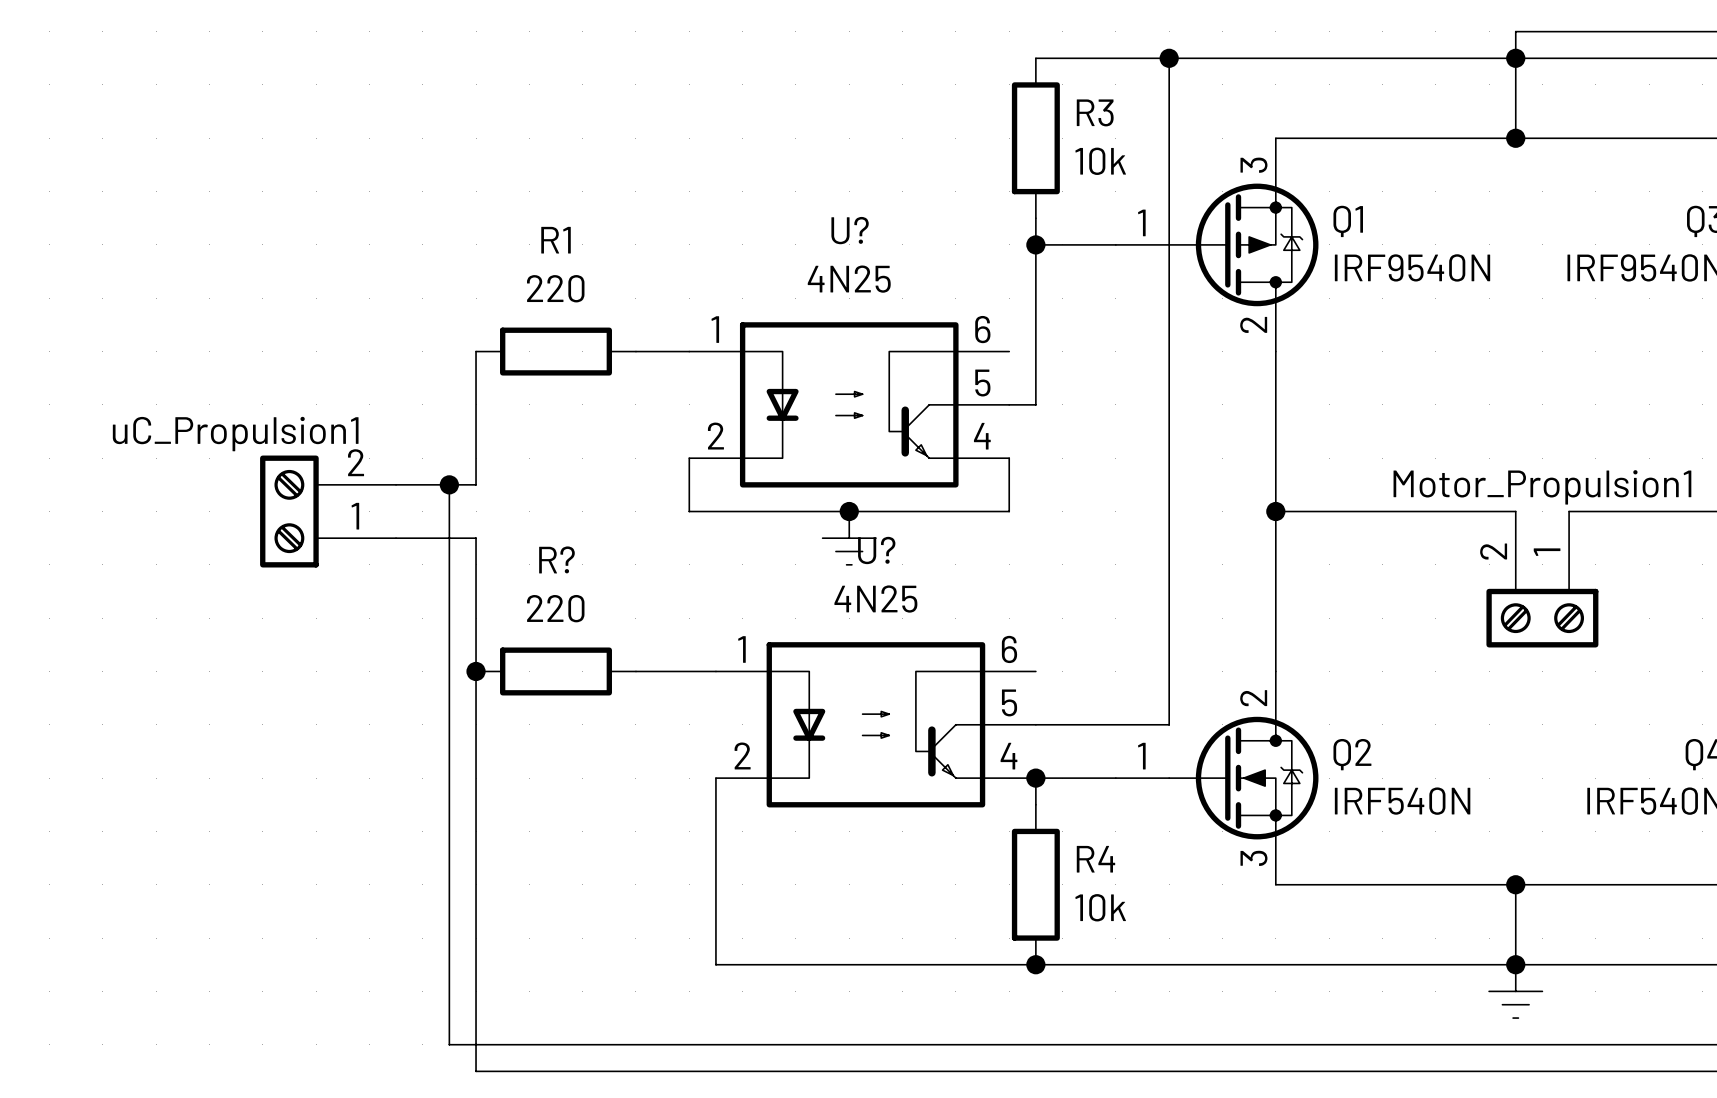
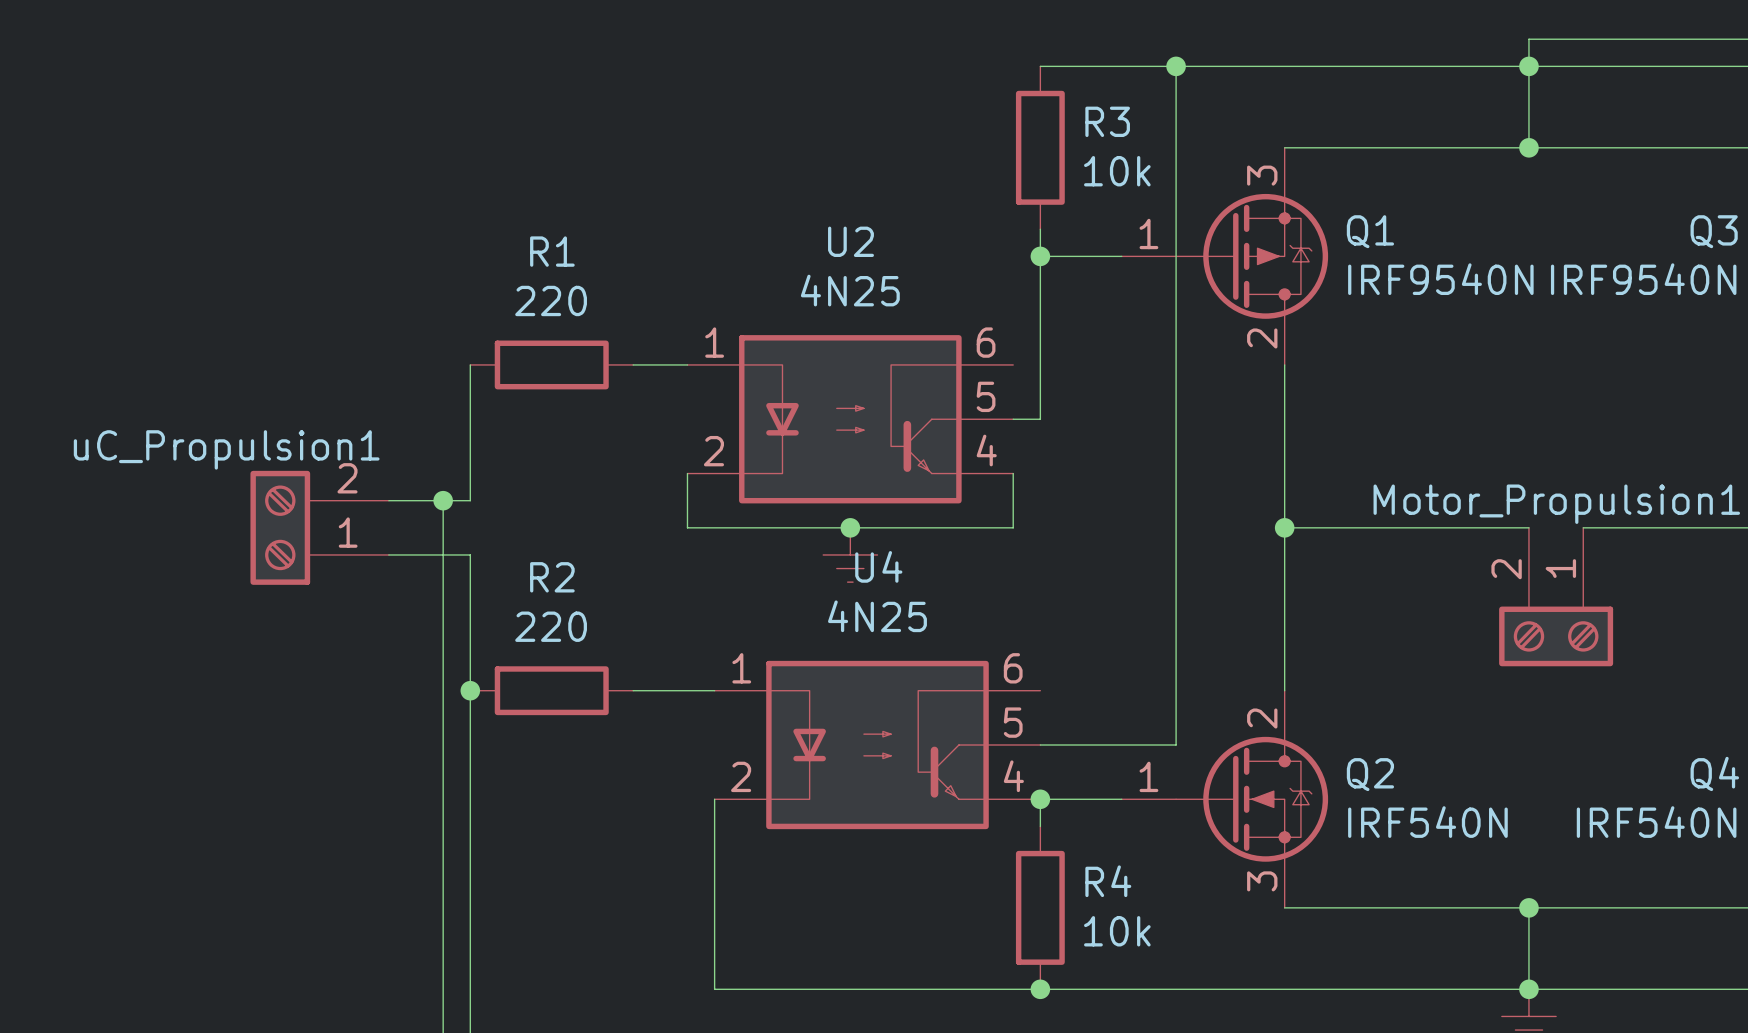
U? name: U? (850, 230) -> U2 (850, 241)
U? name: U? (876, 550) -> U4 (878, 566)
R? name: R? (556, 559) -> R2 (552, 577)

